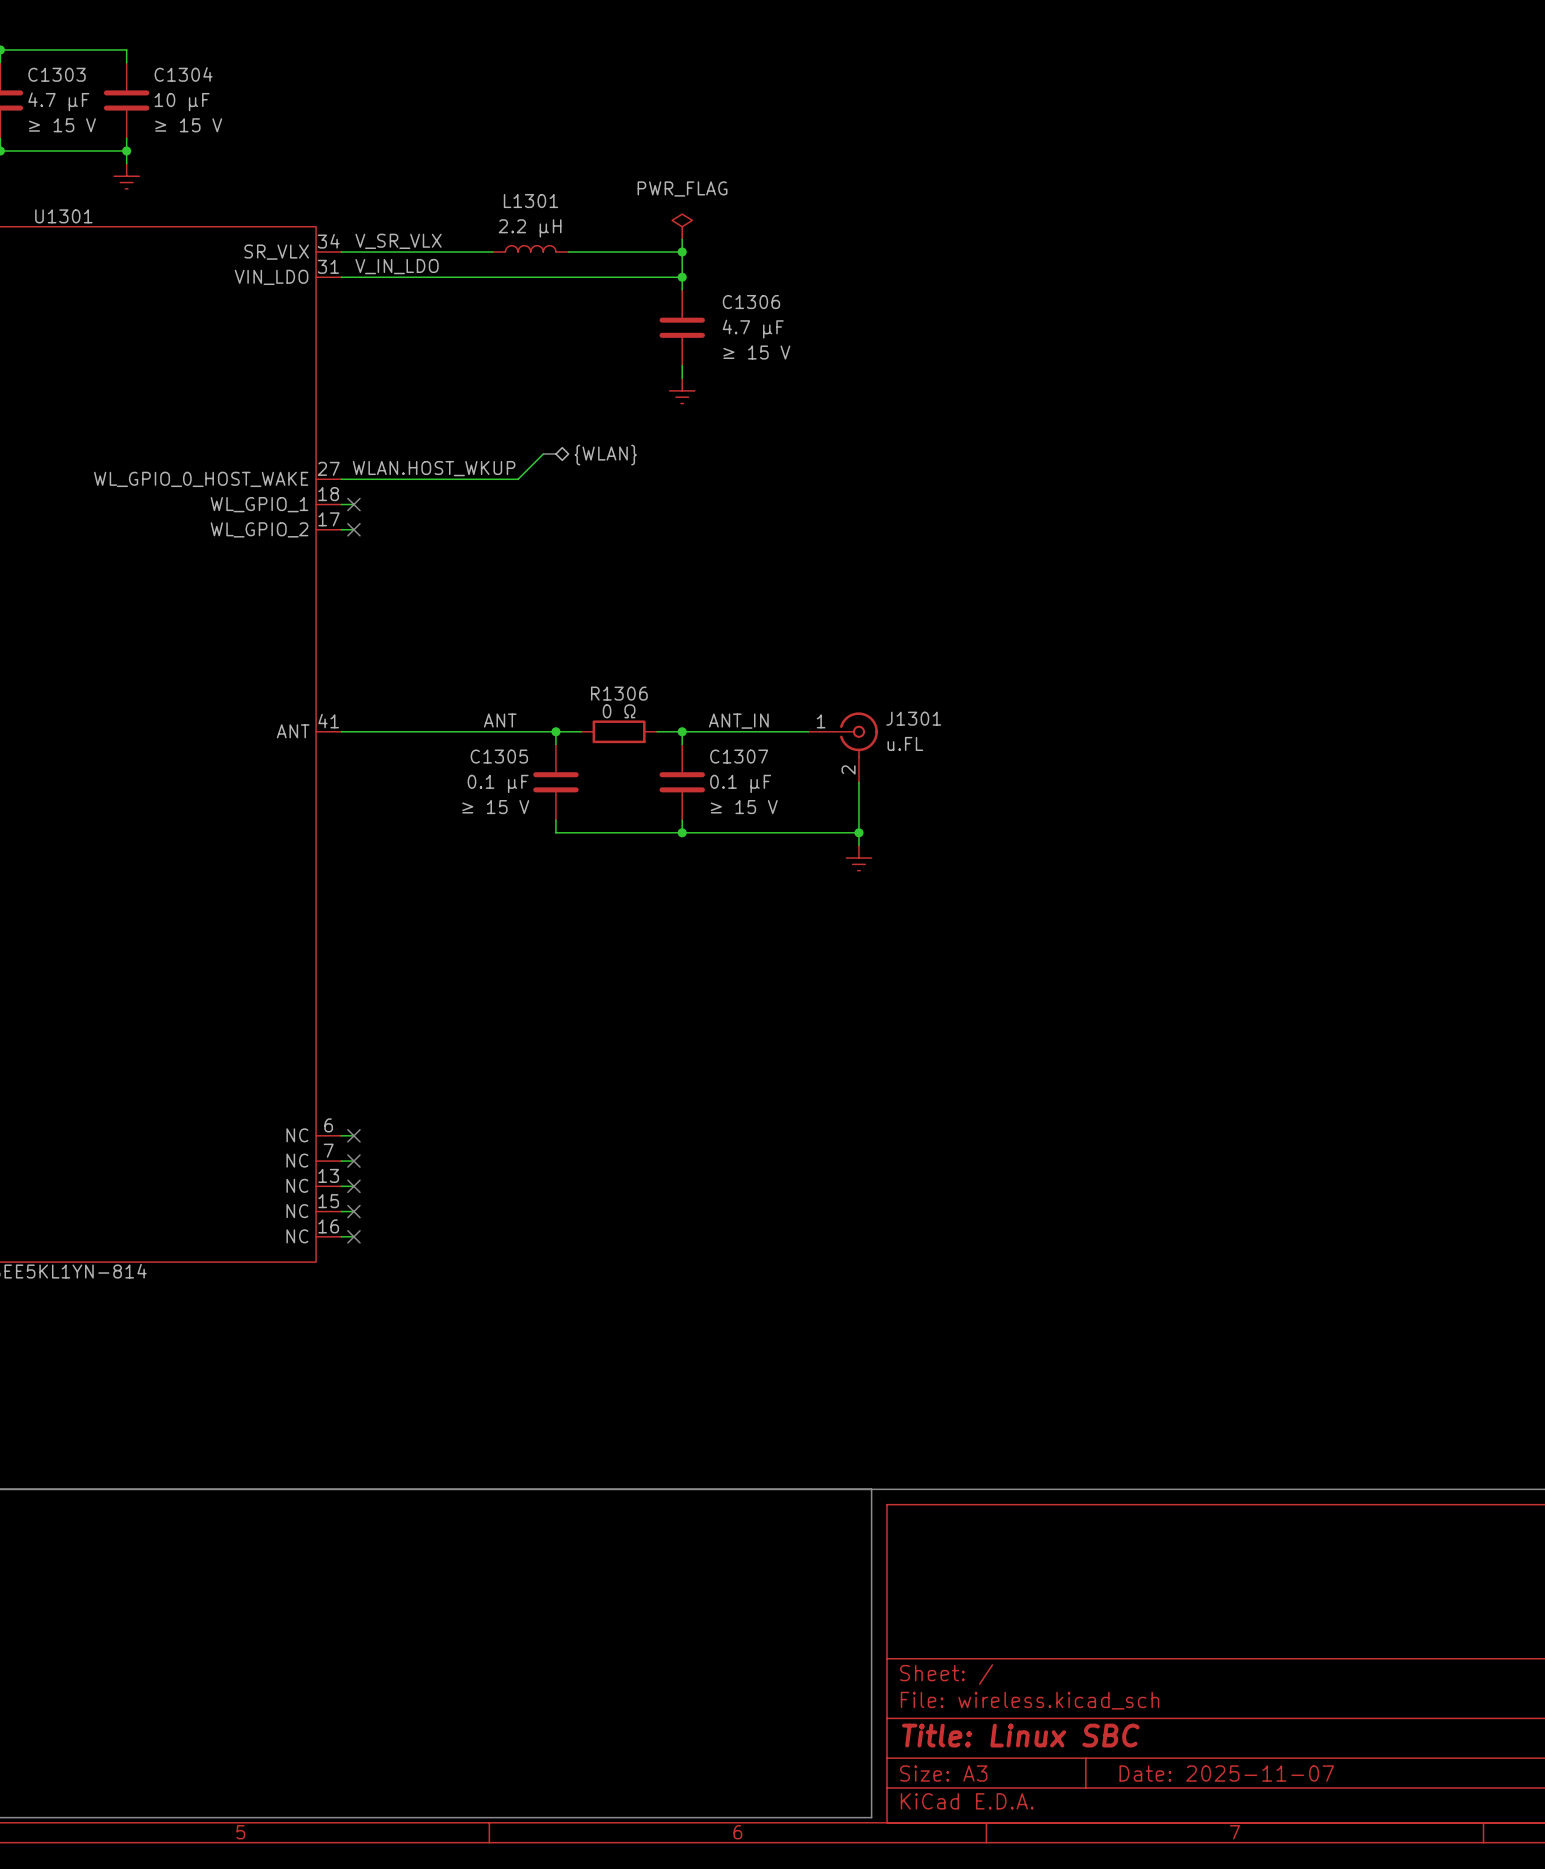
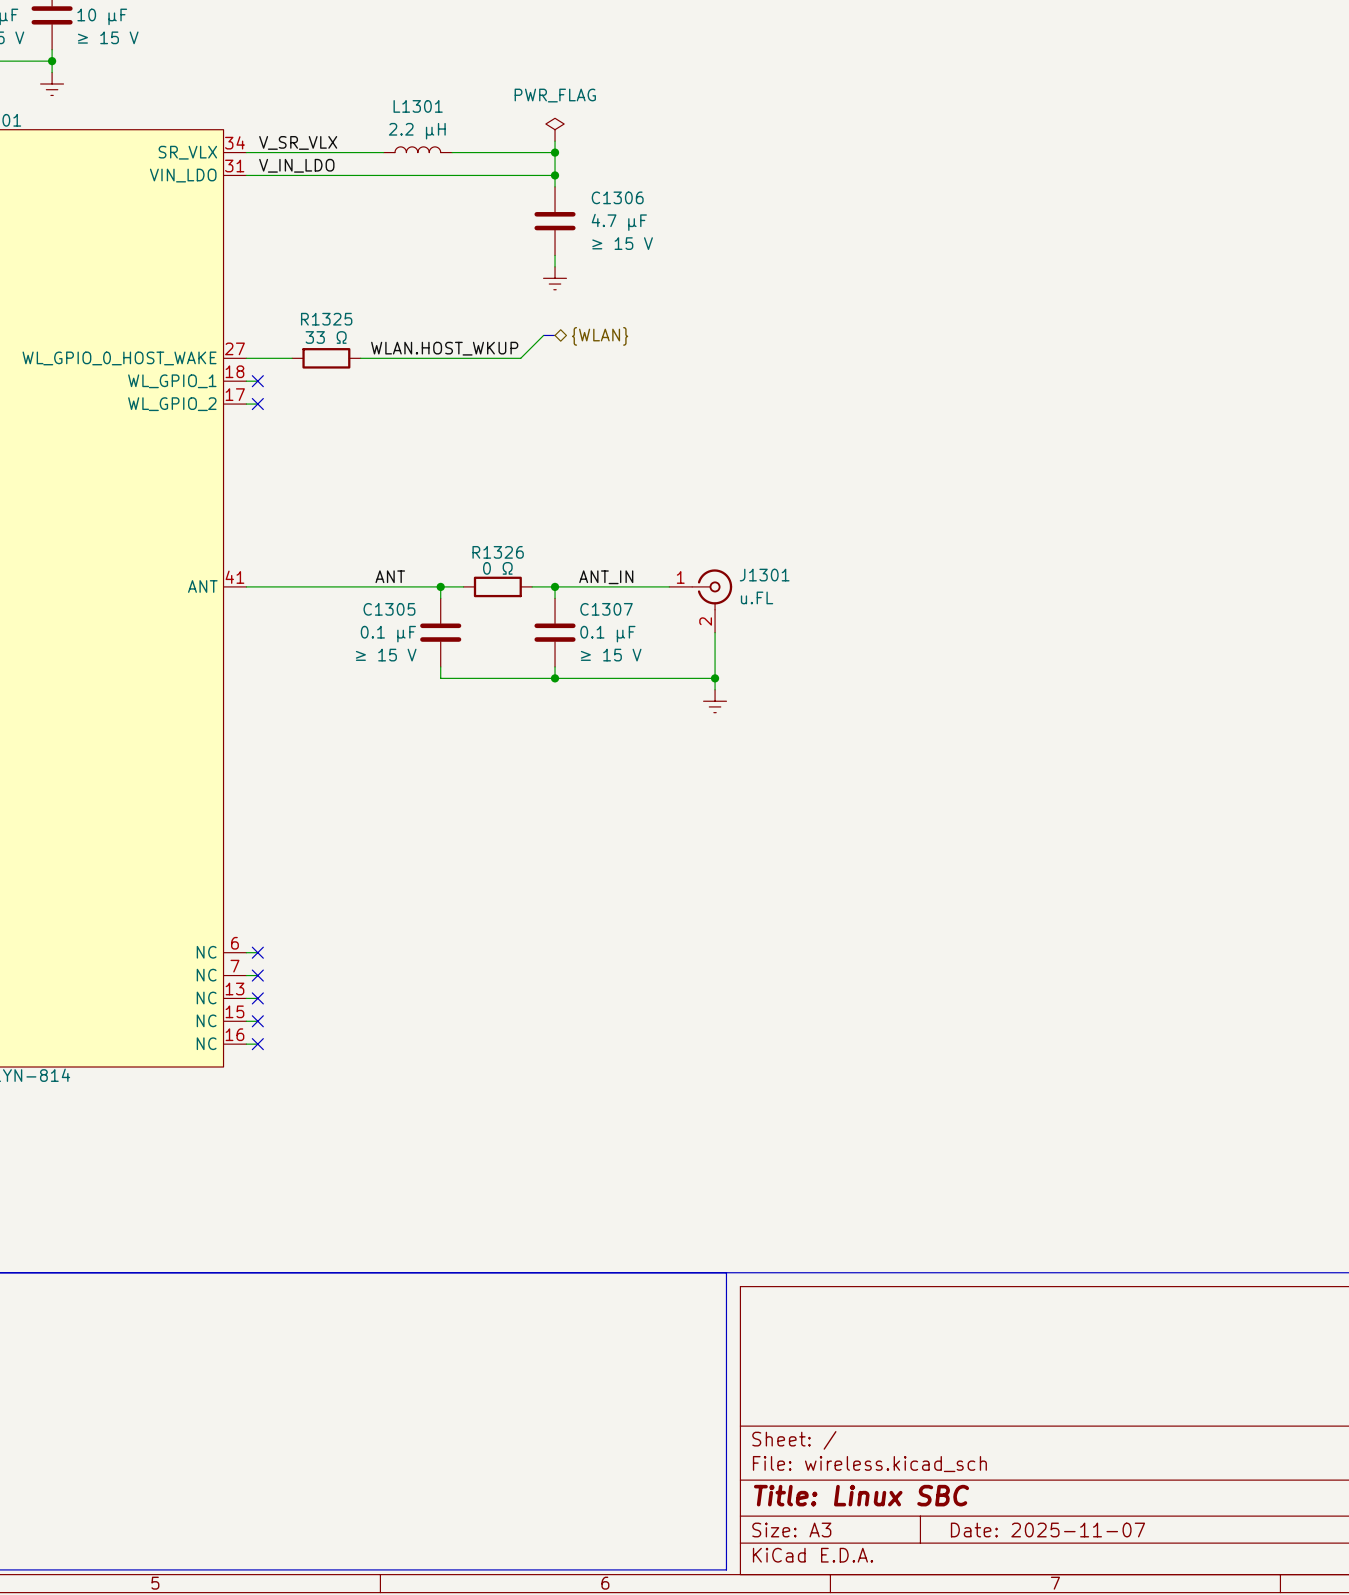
wire: (543, 454) (518, 479) -> (543, 335) (520, 358) (406, 358)
bus: (543, 454) (555, 454) -> (543, 335) (555, 335)
hierarchical label position: {WLAN} (605, 455) -> {WLAN} (600, 336)
label position: WLAN.HOST_WKUP (434, 468) -> WLAN.HOST_WKUP (444, 348)
wire: (391, 479) (467, 479) -> none
R1325: none -> 33 Ω (326, 358)
R1306 name: R1306 (619, 693) -> R1326 (498, 552)

